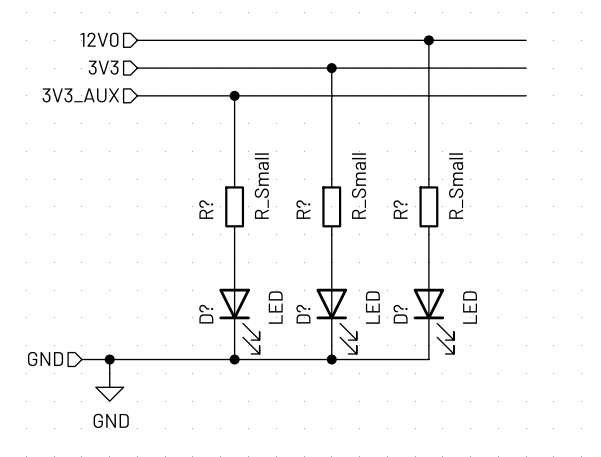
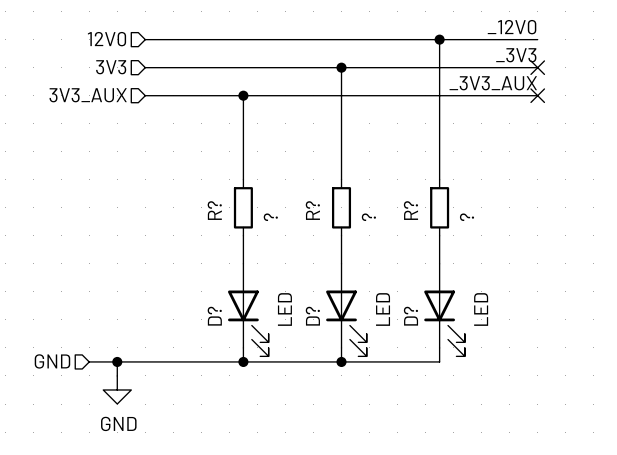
label: none -> _12V0 (512, 27)
label: none -> _3V3 (516, 55)
no-connect mark: none -> (537, 67)
label: none -> _3V3_AUX (493, 83)
no-connect mark: none -> (537, 95)
R? value: R_Small (261, 186) -> ? (270, 217)
R? value: R_Small (358, 186) -> ? (368, 217)
R? value: R_Small (456, 186) -> ? (467, 217)

